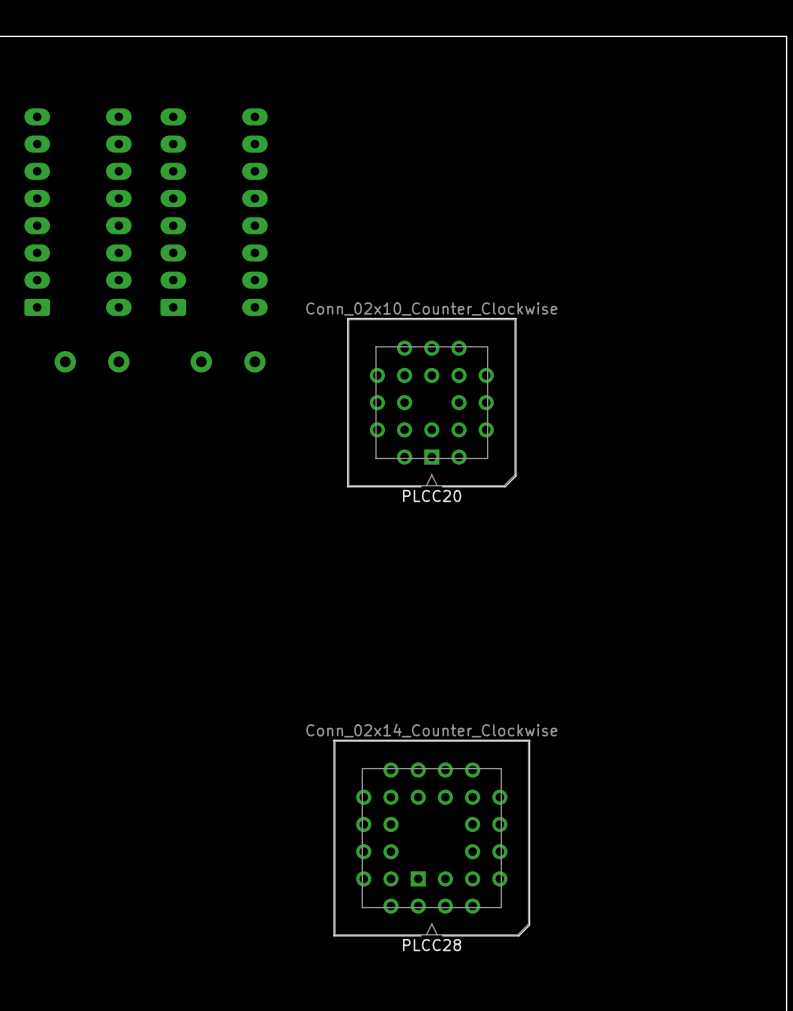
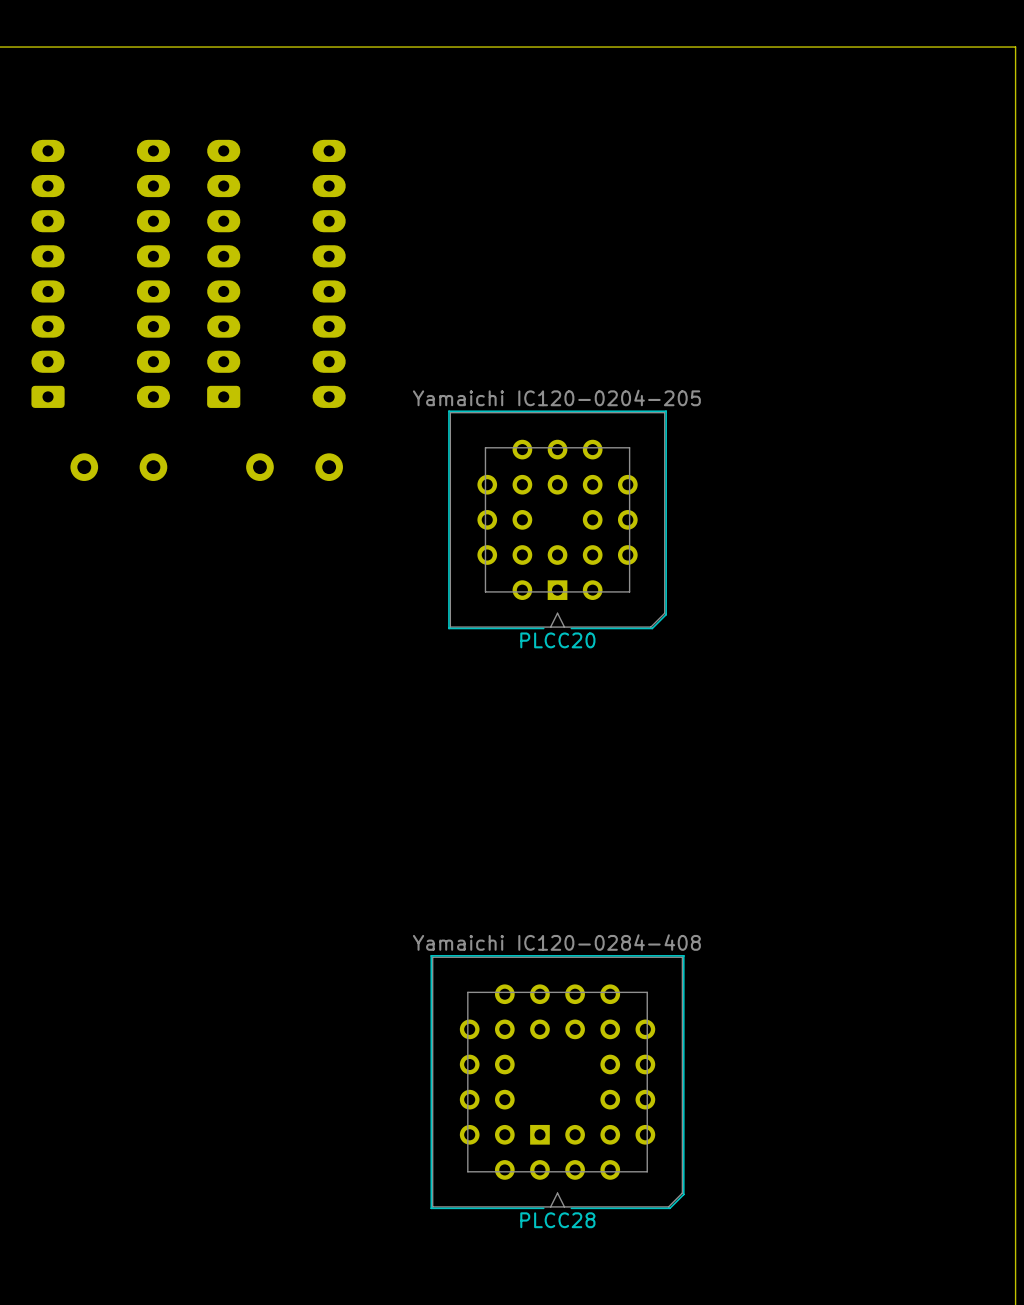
PLCC20 value: Conn_02x10_Counter_Clockwise (431, 309) -> Yamaichi IC120-0204-205 (556, 397)
PLCC28 value: Conn_02x14_Counter_Clockwise (431, 730) -> Yamaichi IC120-0284-408 (556, 942)

